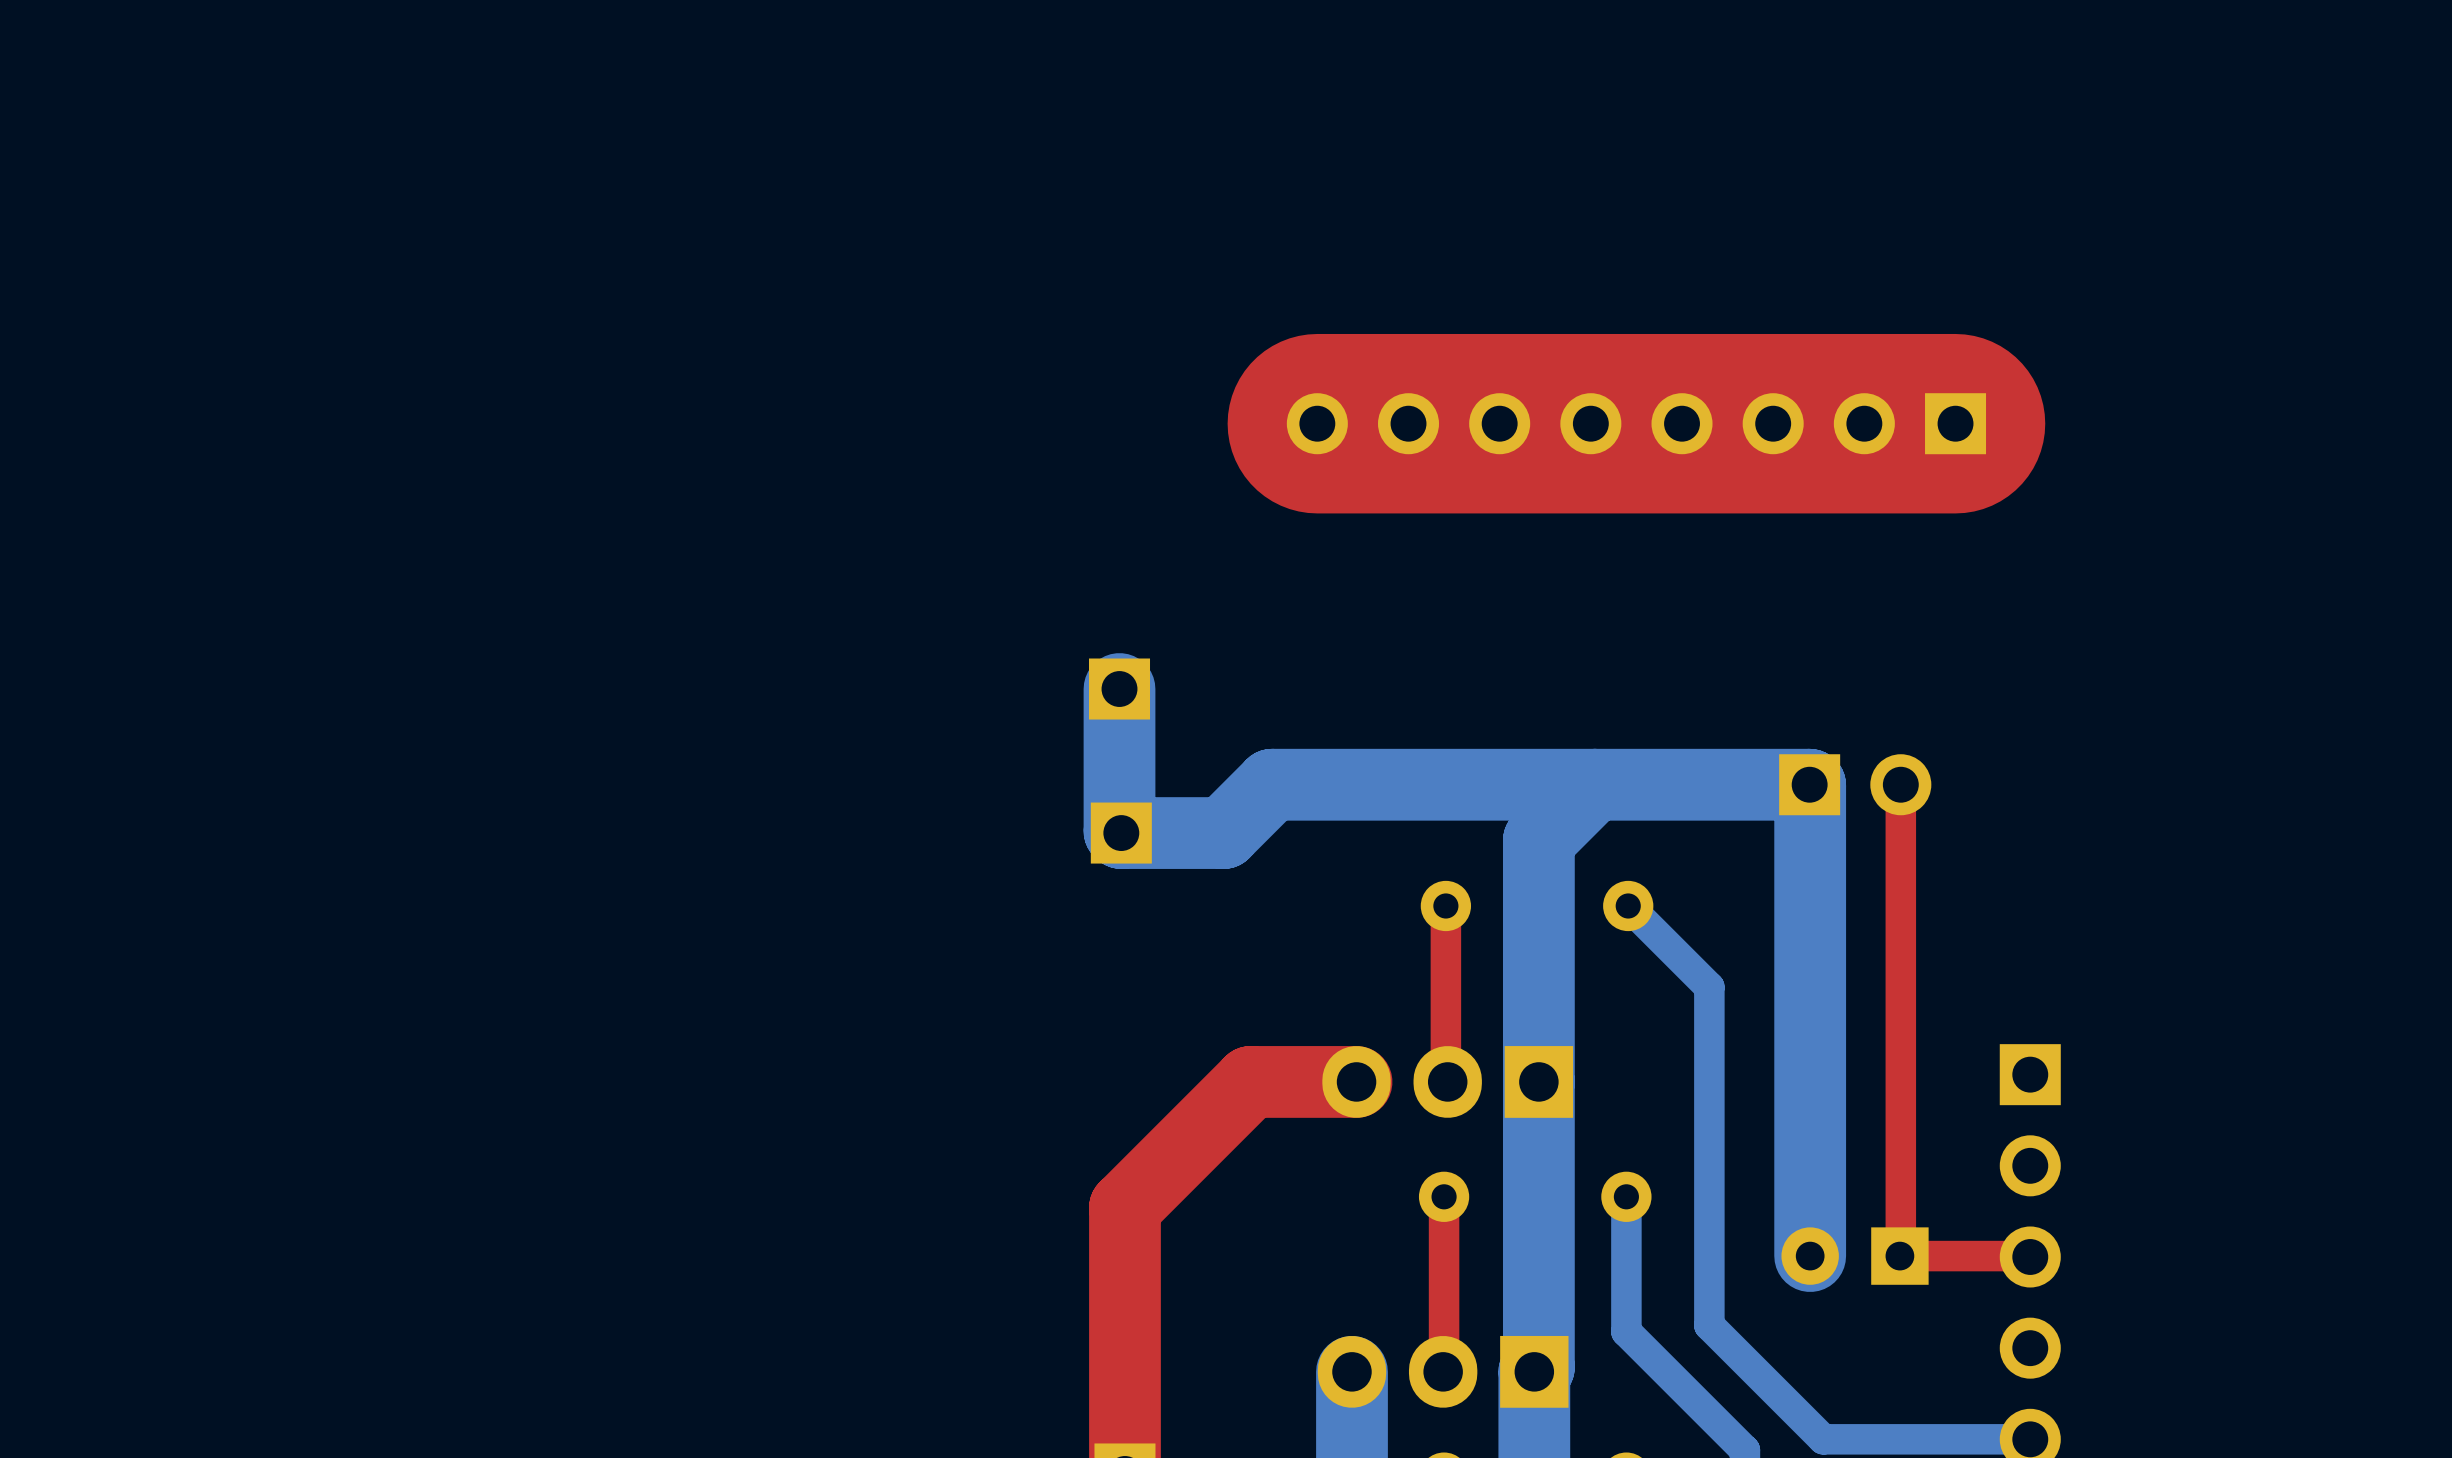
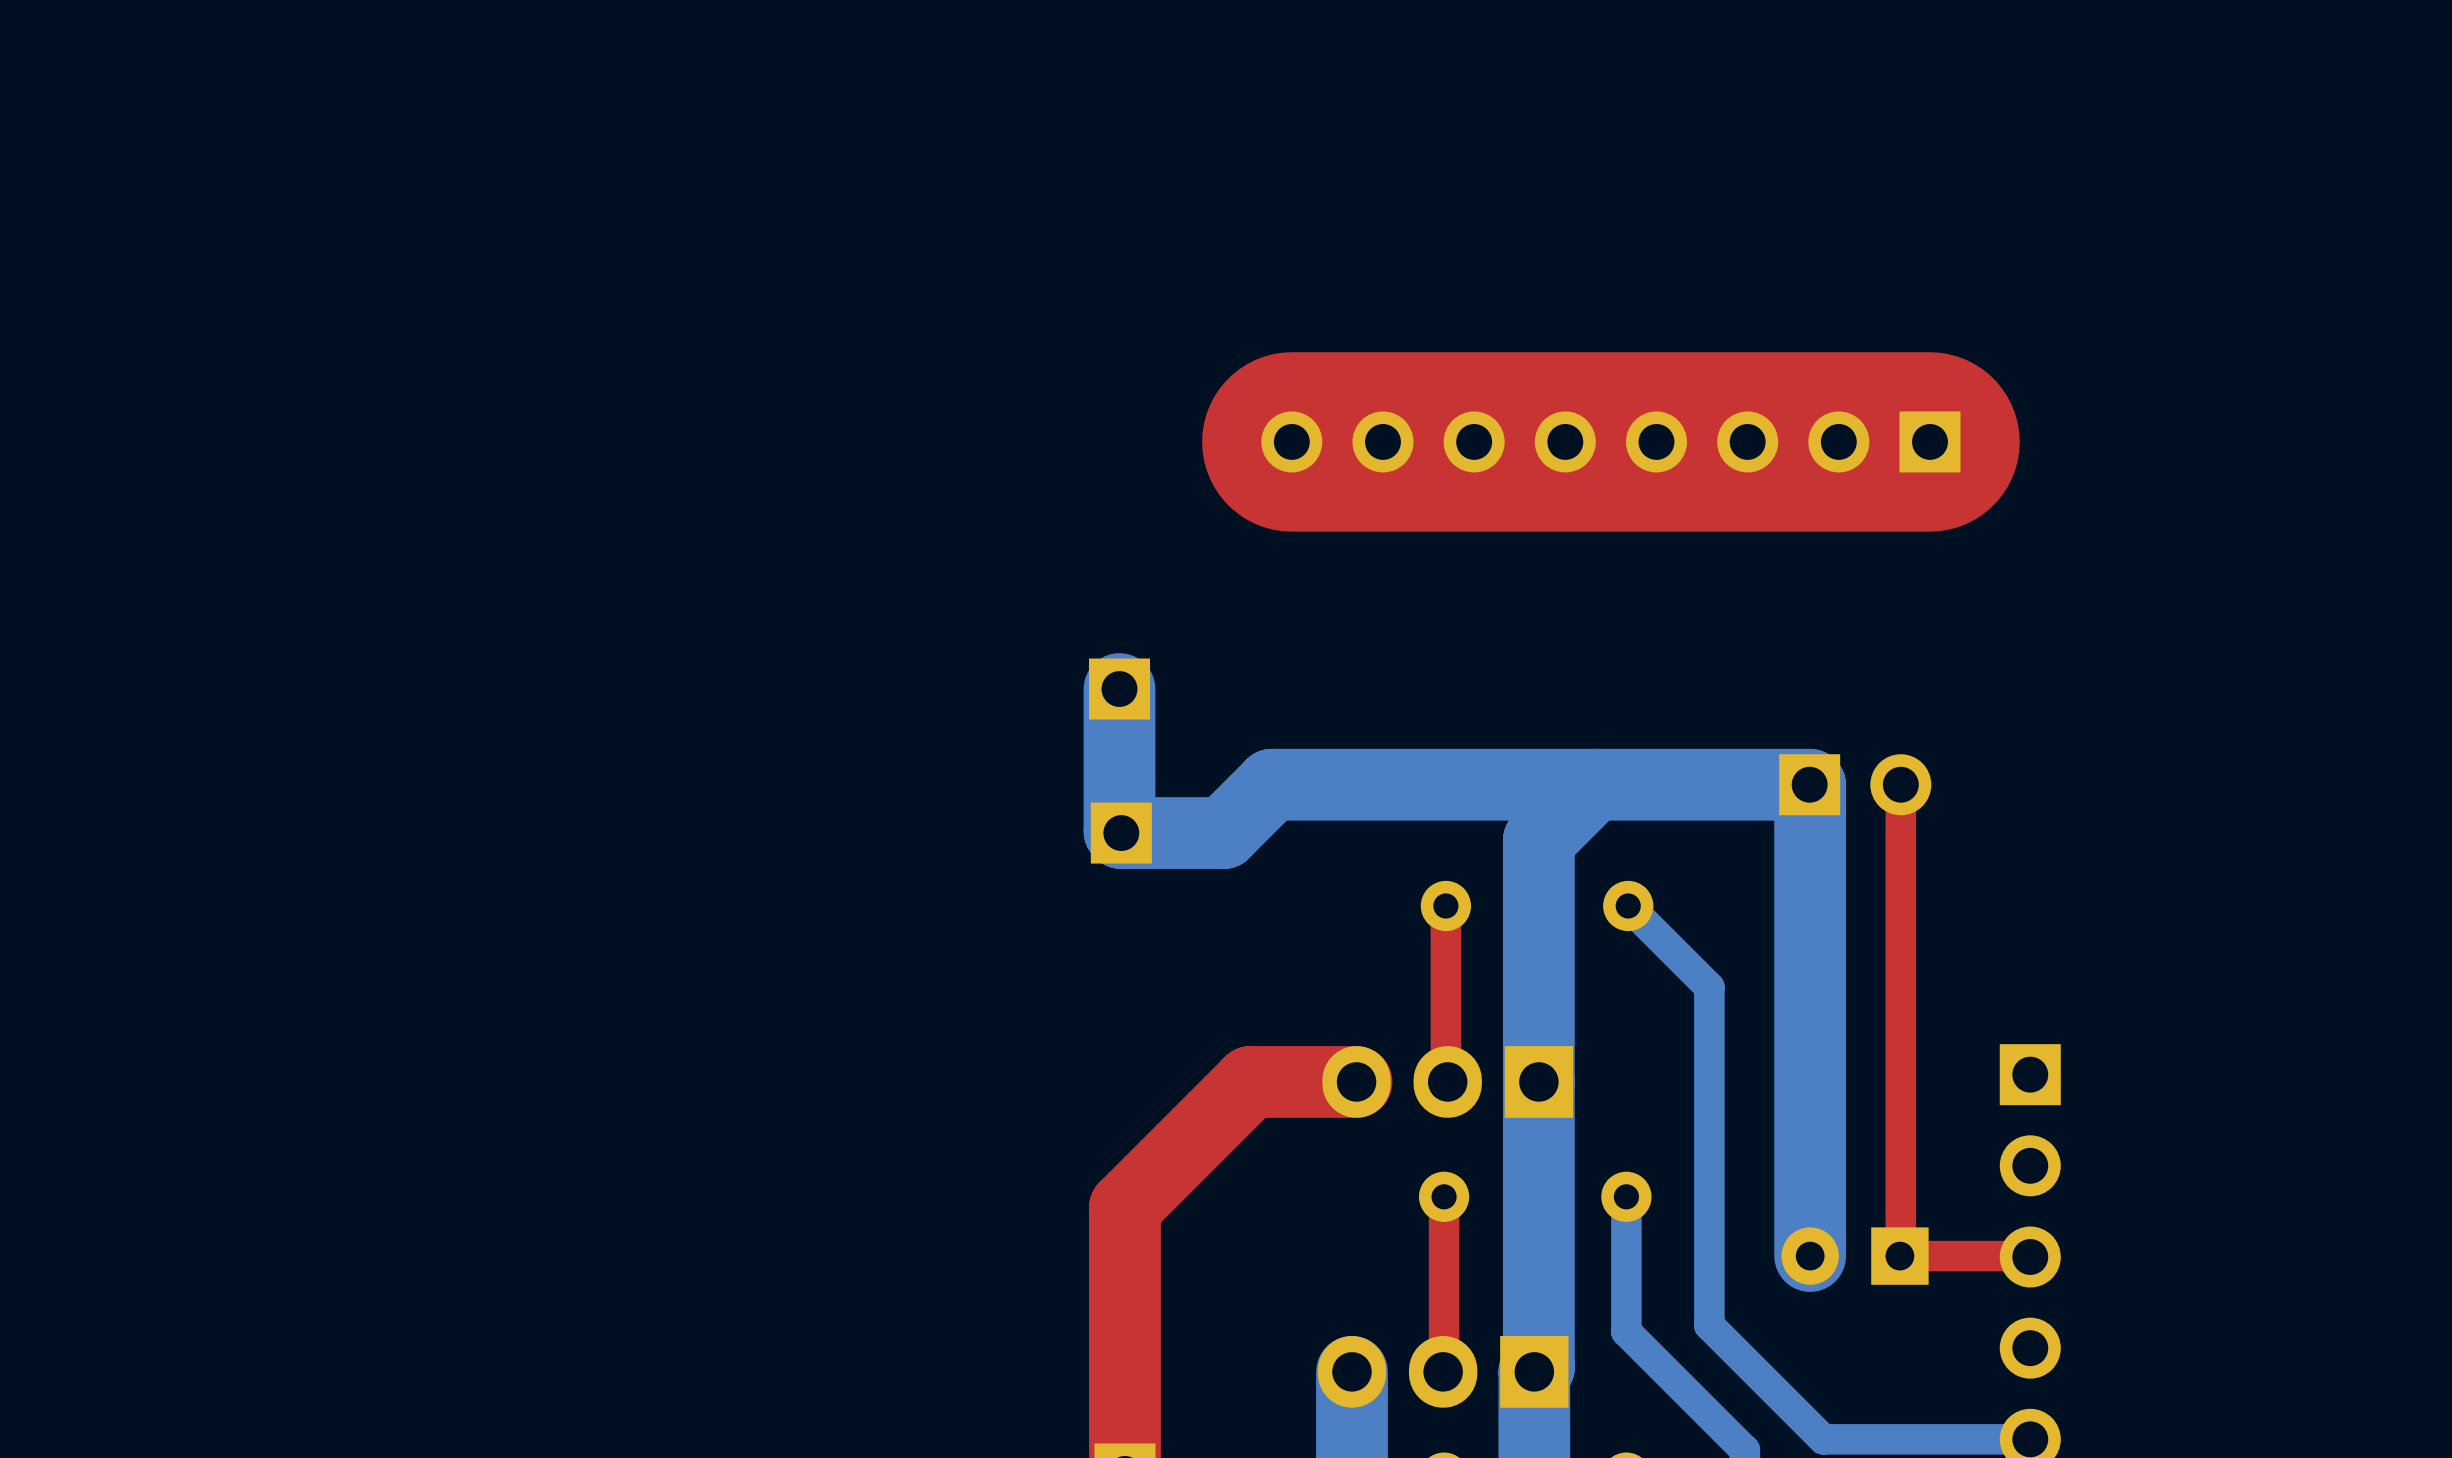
part position: (1636, 423) -> (1610, 441)
top track: (1955, 423) (1317, 423) -> (1929, 441) (1291, 441)

